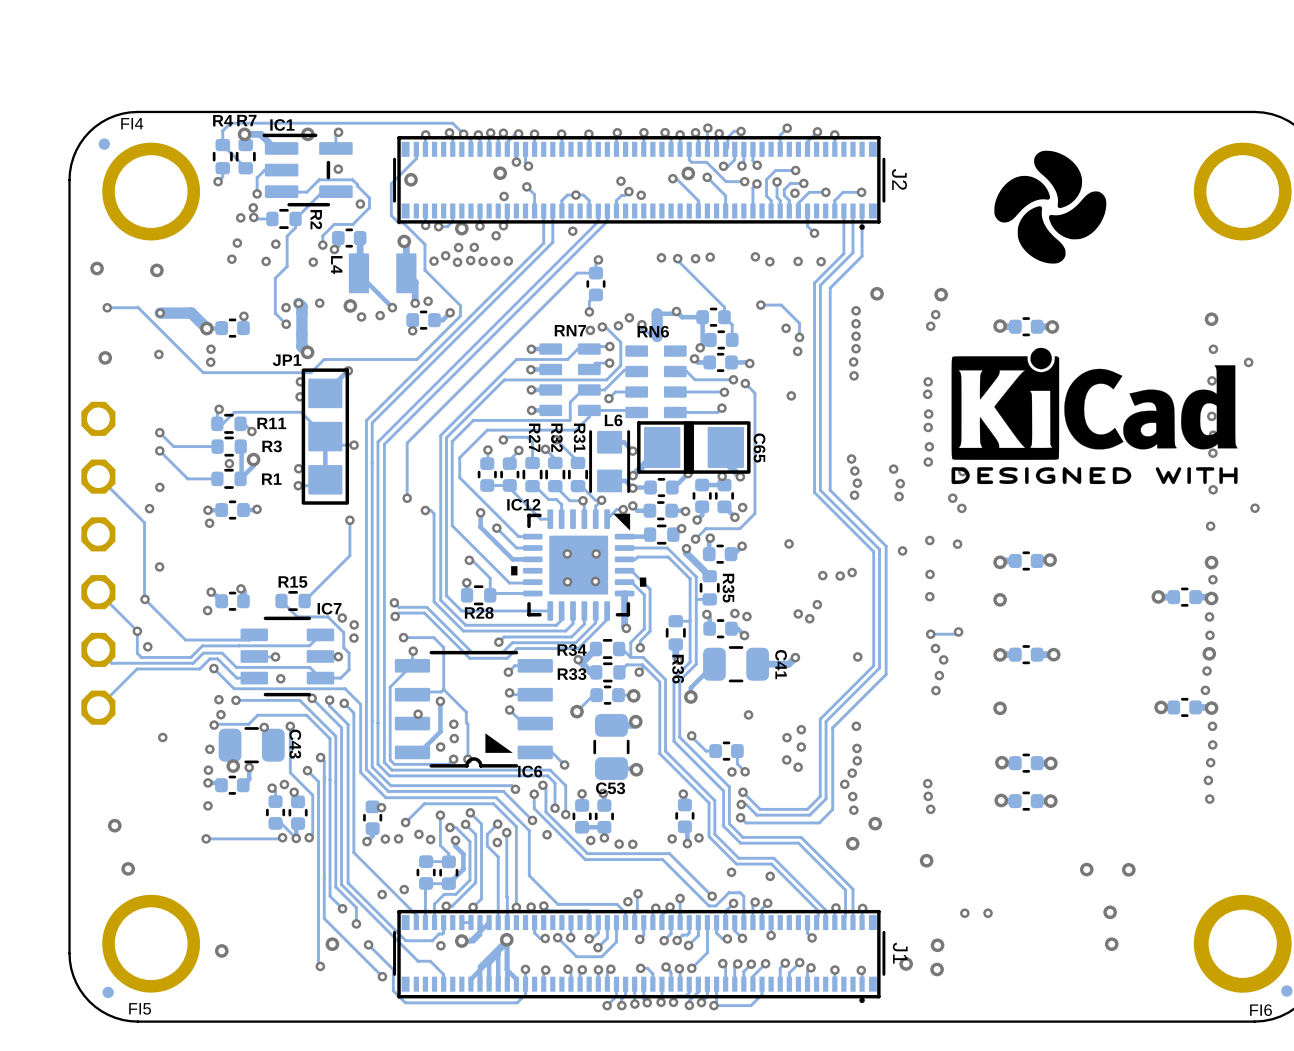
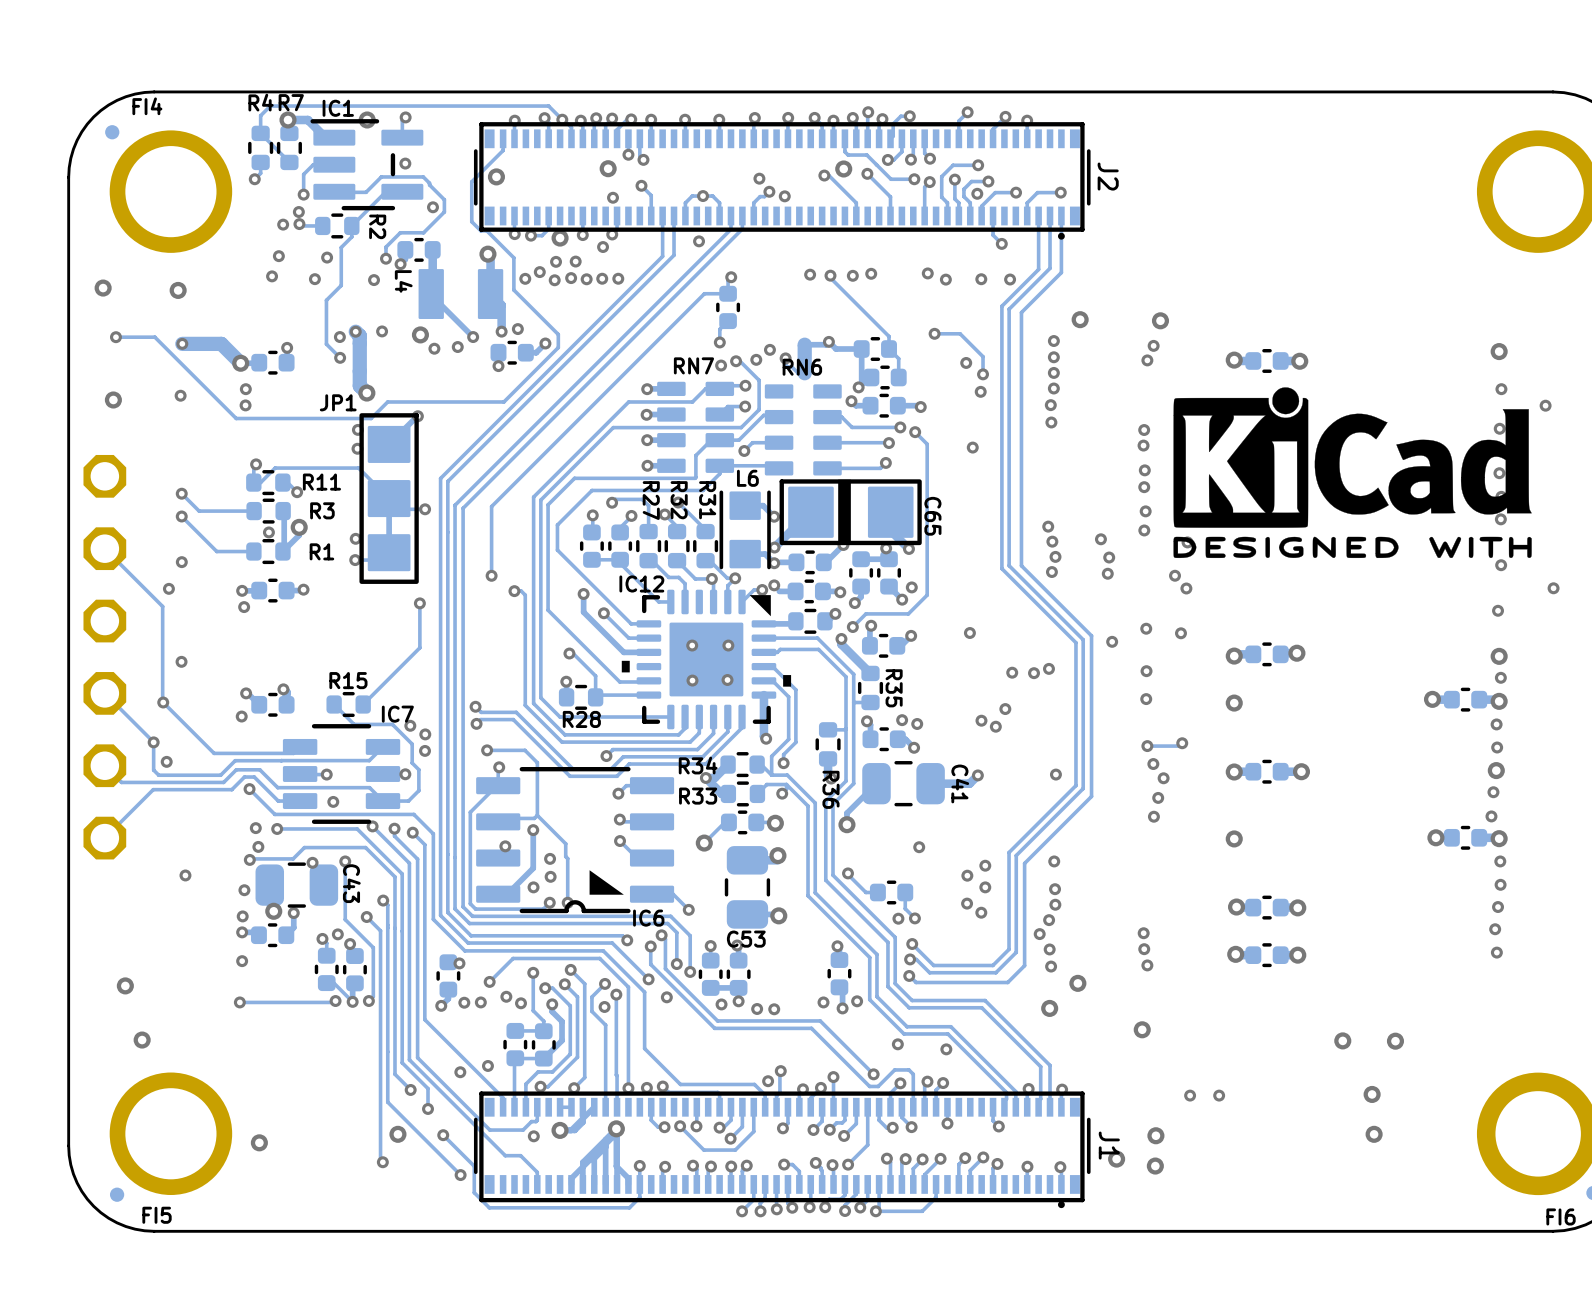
drawing: [994, 150, 1107, 264] -> none

